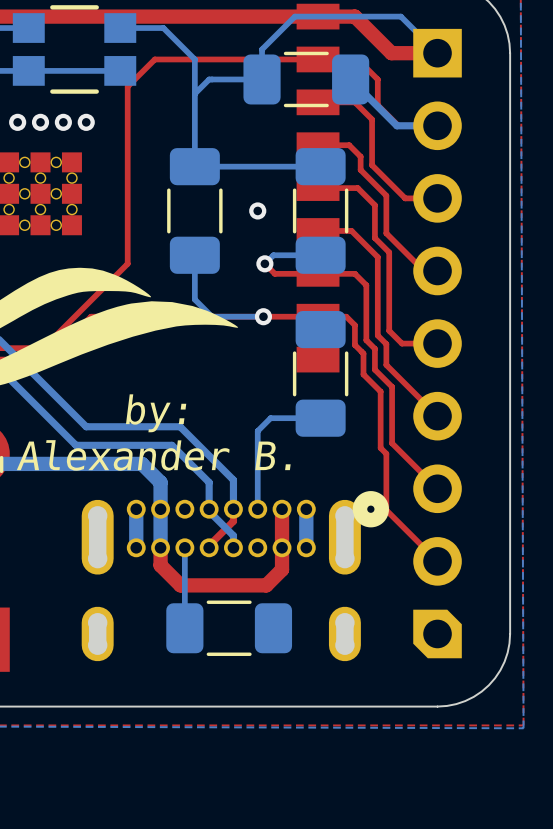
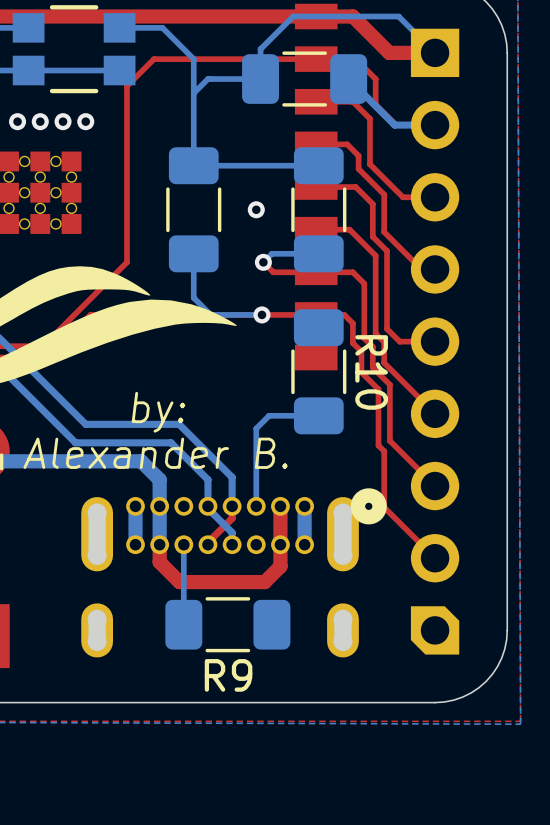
R10 name: none -> R10 (371, 372)
R9 name: none -> R9 (228, 675)

